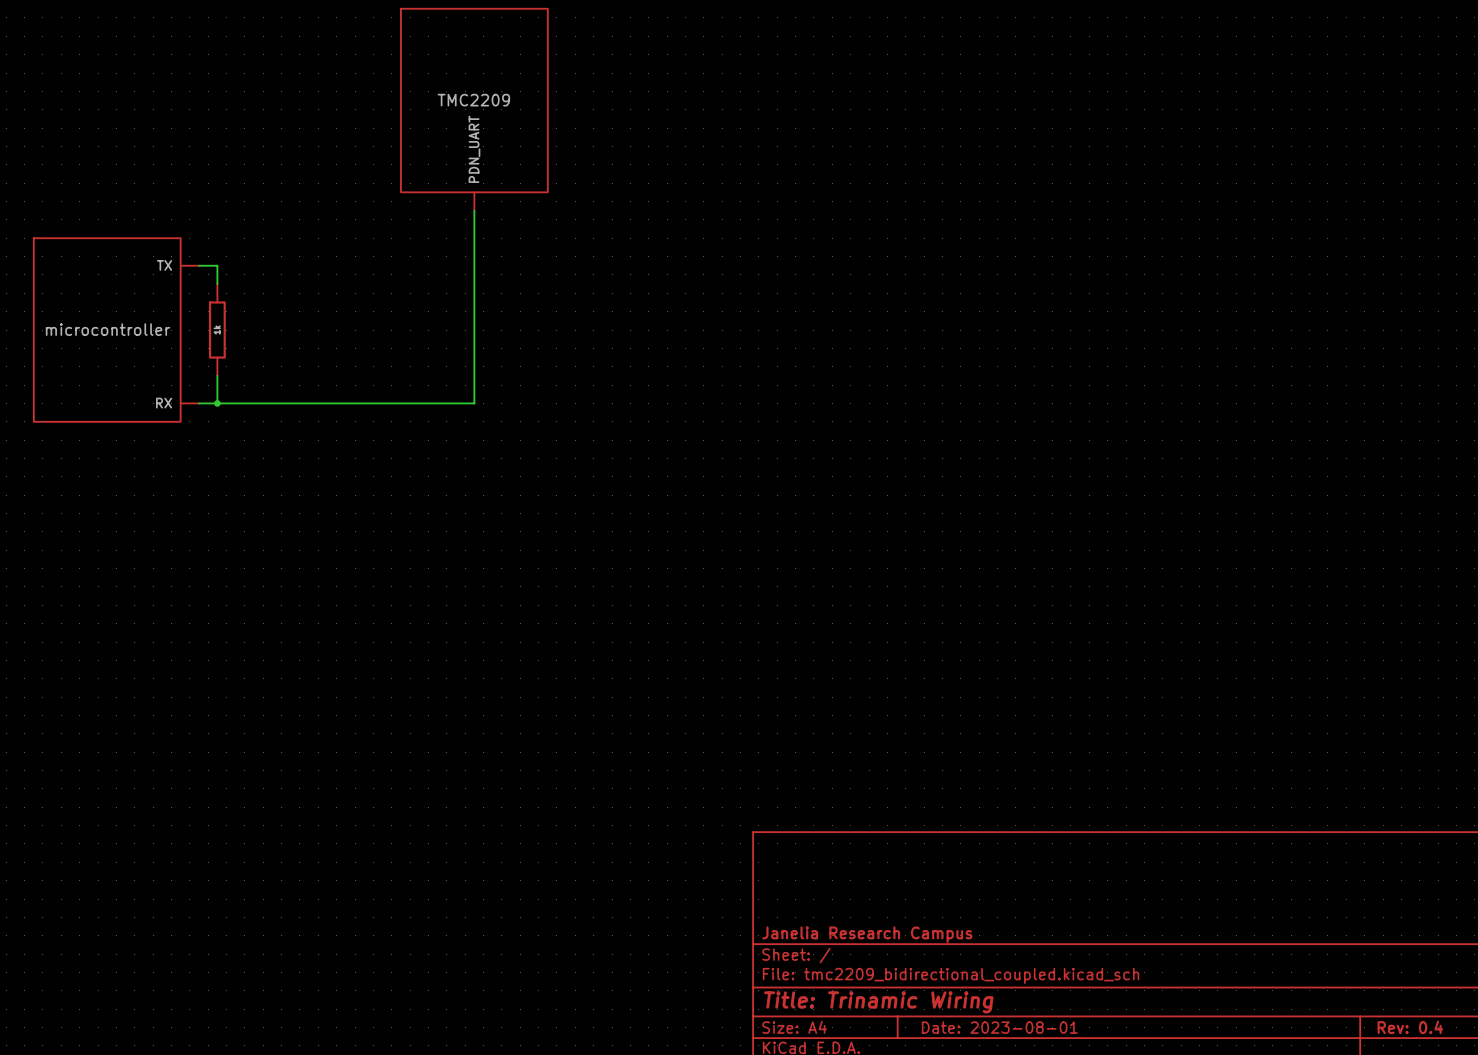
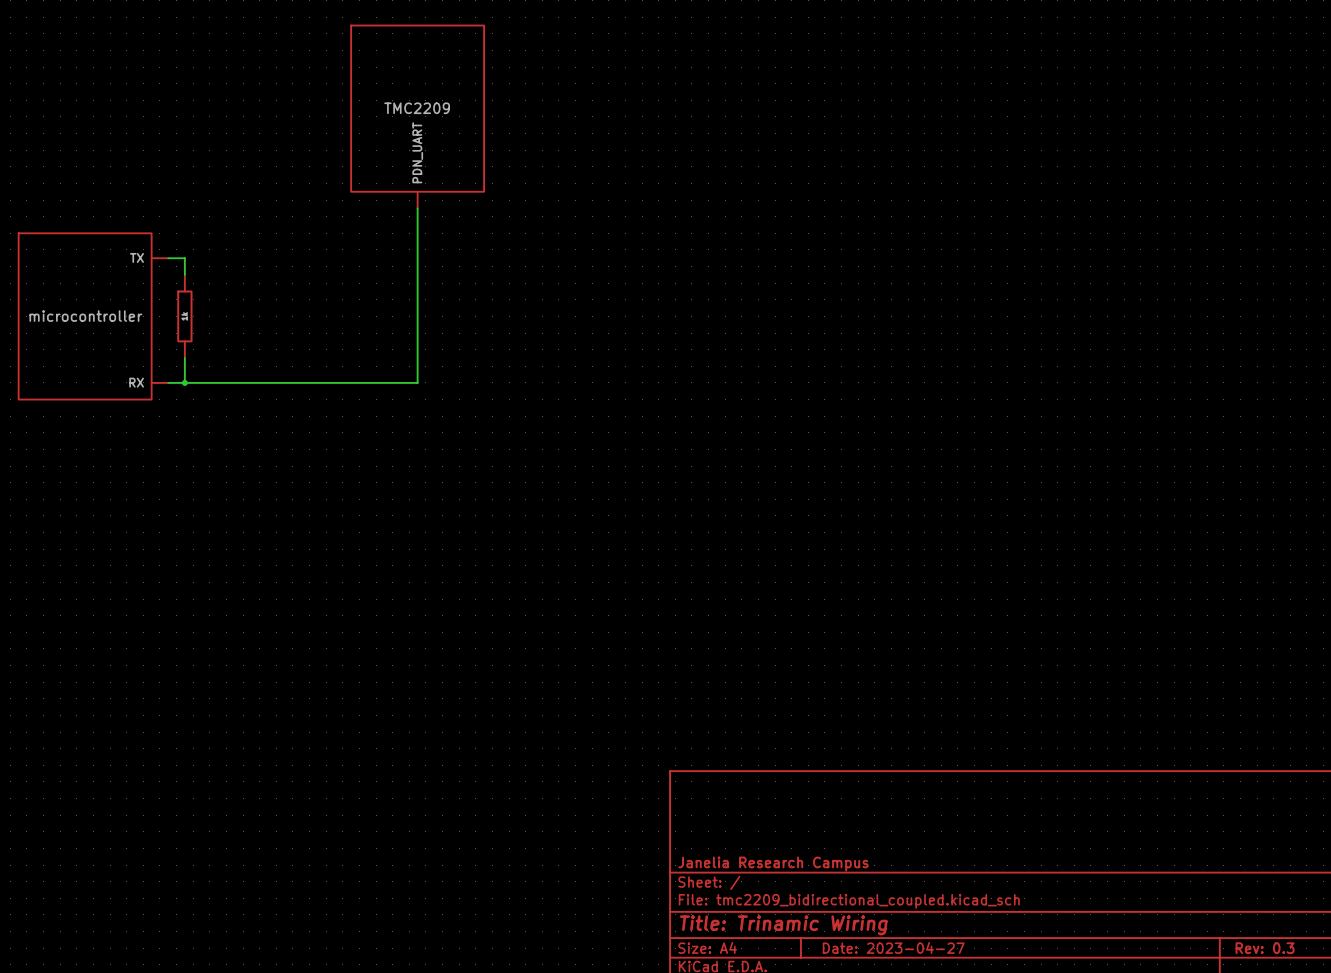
title block: Date: 2023-08-01 (999, 1027) -> Date: 2023-04-27 (893, 947)
title block: Rev: 0.4 (1410, 1027) -> Rev: 0.3 (1265, 948)

